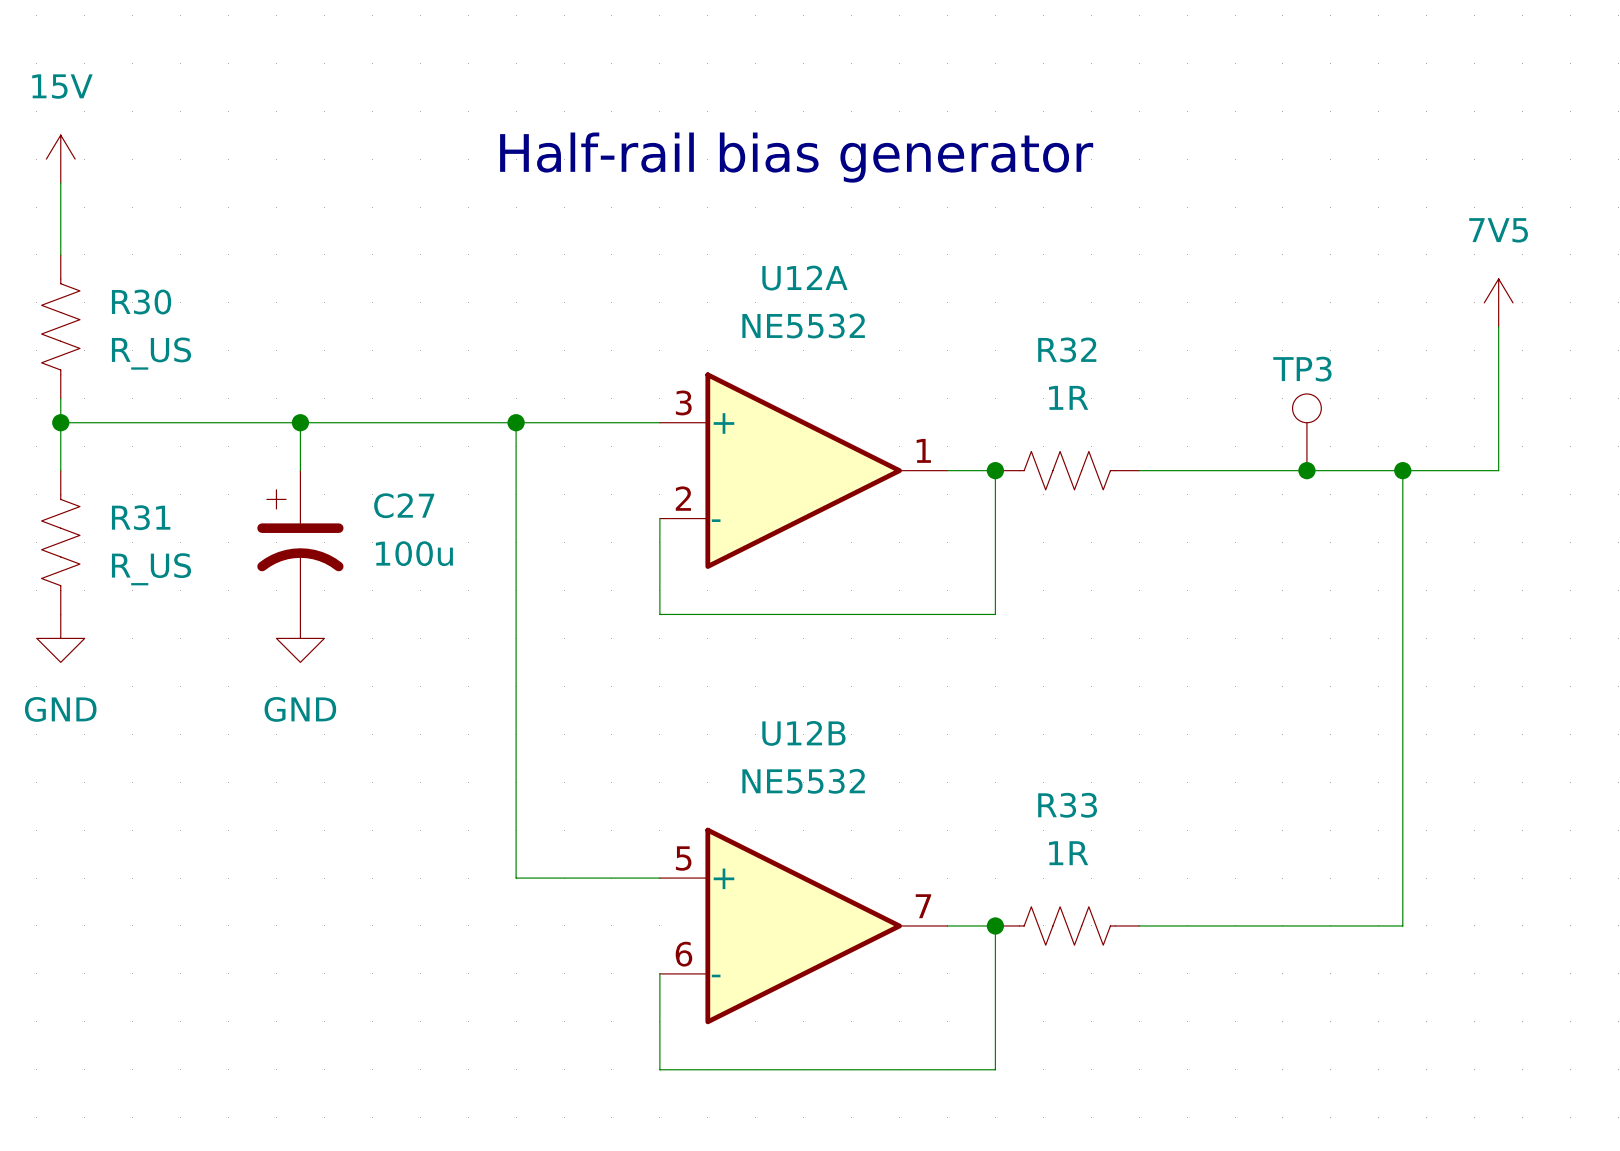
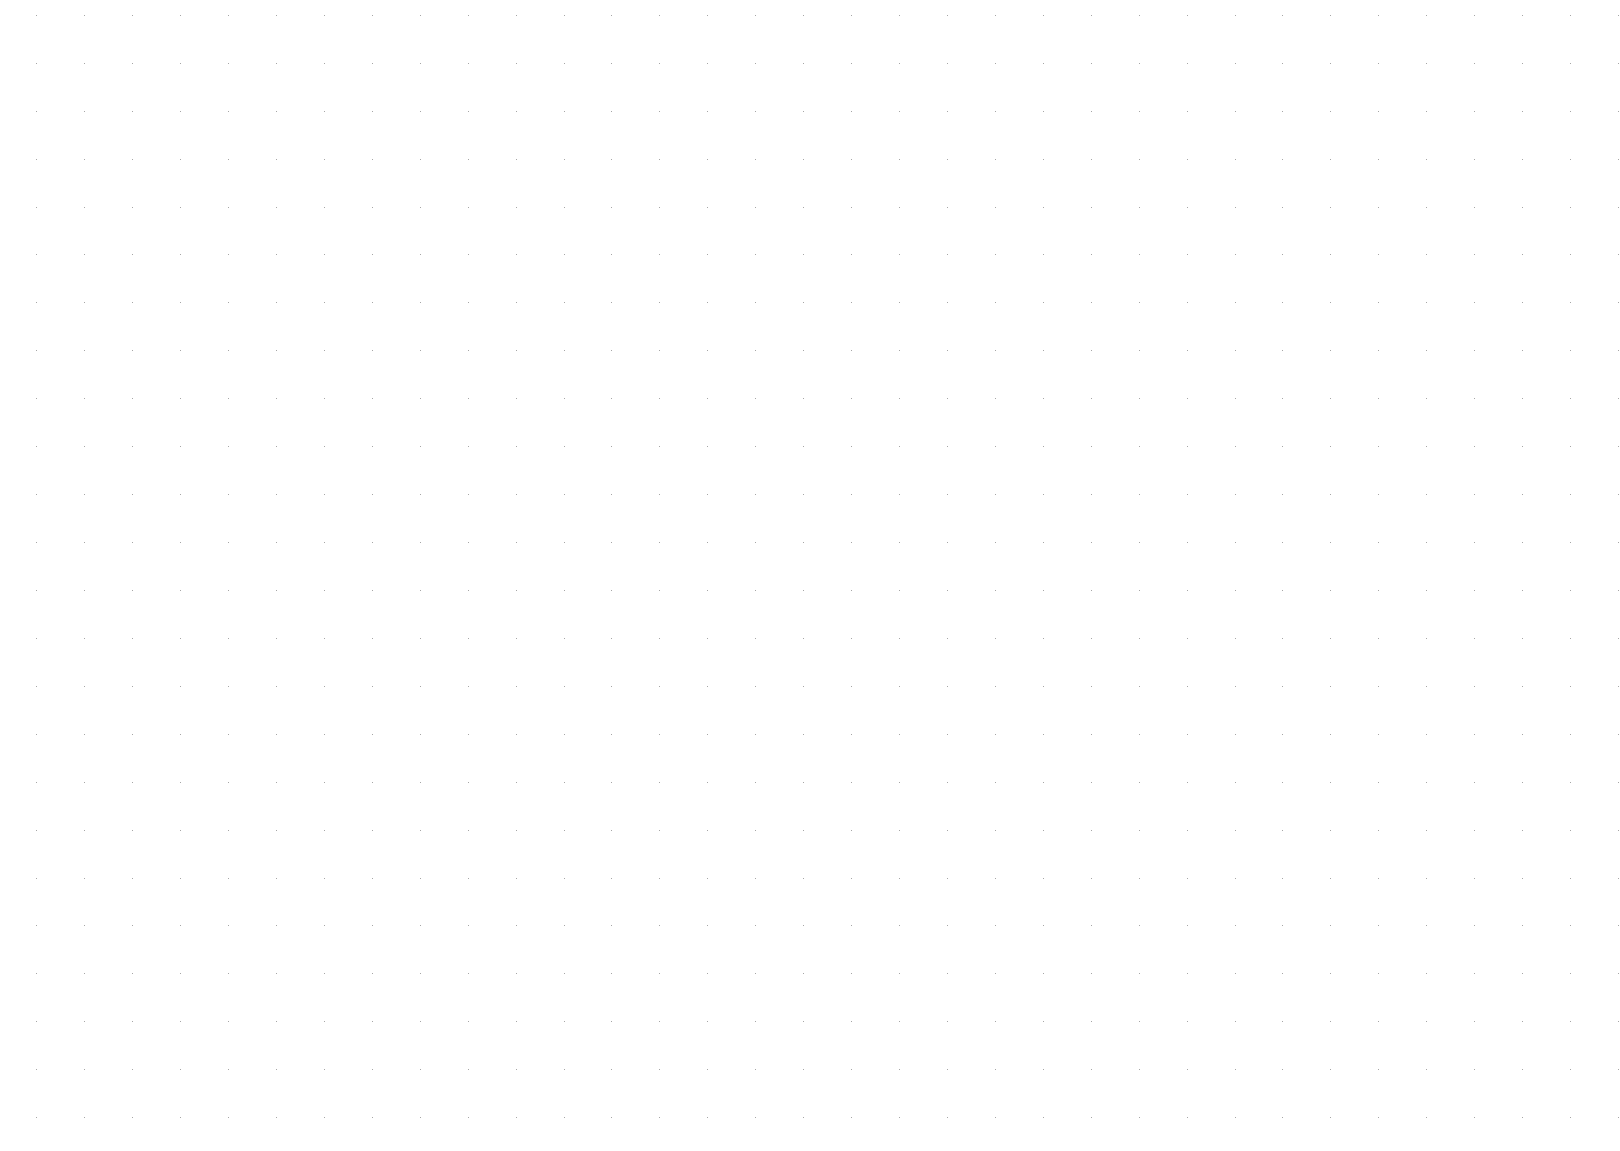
text: Half-rail bias generator (796, 157) -> none
power symbol: 15V (60, 159) -> none
wire: (60, 183) (60, 254) -> none
power symbol: 7V5 (1498, 302) -> none
R30: R_US (60, 326) -> none
wire: (1498, 326) (1498, 470) (1139, 470) -> none
wire: (60, 398) (60, 470) -> none
wire: (60, 422) (659, 422) -> none
junction: (60, 422) -> none
wire: (300, 422) (300, 470) -> none
junction: (300, 422) -> none
wire: (516, 422) (516, 878) (659, 878) -> none
junction: (516, 422) -> none
TP3: (1306, 432) -> none
U12A: NE5532 (803, 470) -> none
wire: (947, 470) (995, 470) (995, 614) (659, 614) (659, 518) -> none
junction: (995, 470) -> none
R32: 1R (1067, 470) -> none
junction: (1306, 470) -> none
wire: (1402, 470) (1402, 925) (1139, 925) -> none
junction: (1402, 470) -> none
R31: R_US (60, 542) -> none
C27: 100u (300, 542) -> none
power symbol: GND (60, 638) -> none
power symbol: GND (300, 638) -> none
U12B: NE5532 (803, 925) -> none
wire: (947, 925) (995, 925) (995, 1069) (659, 1069) (659, 973) -> none
junction: (995, 925) -> none
R33: 1R (1067, 925) -> none

